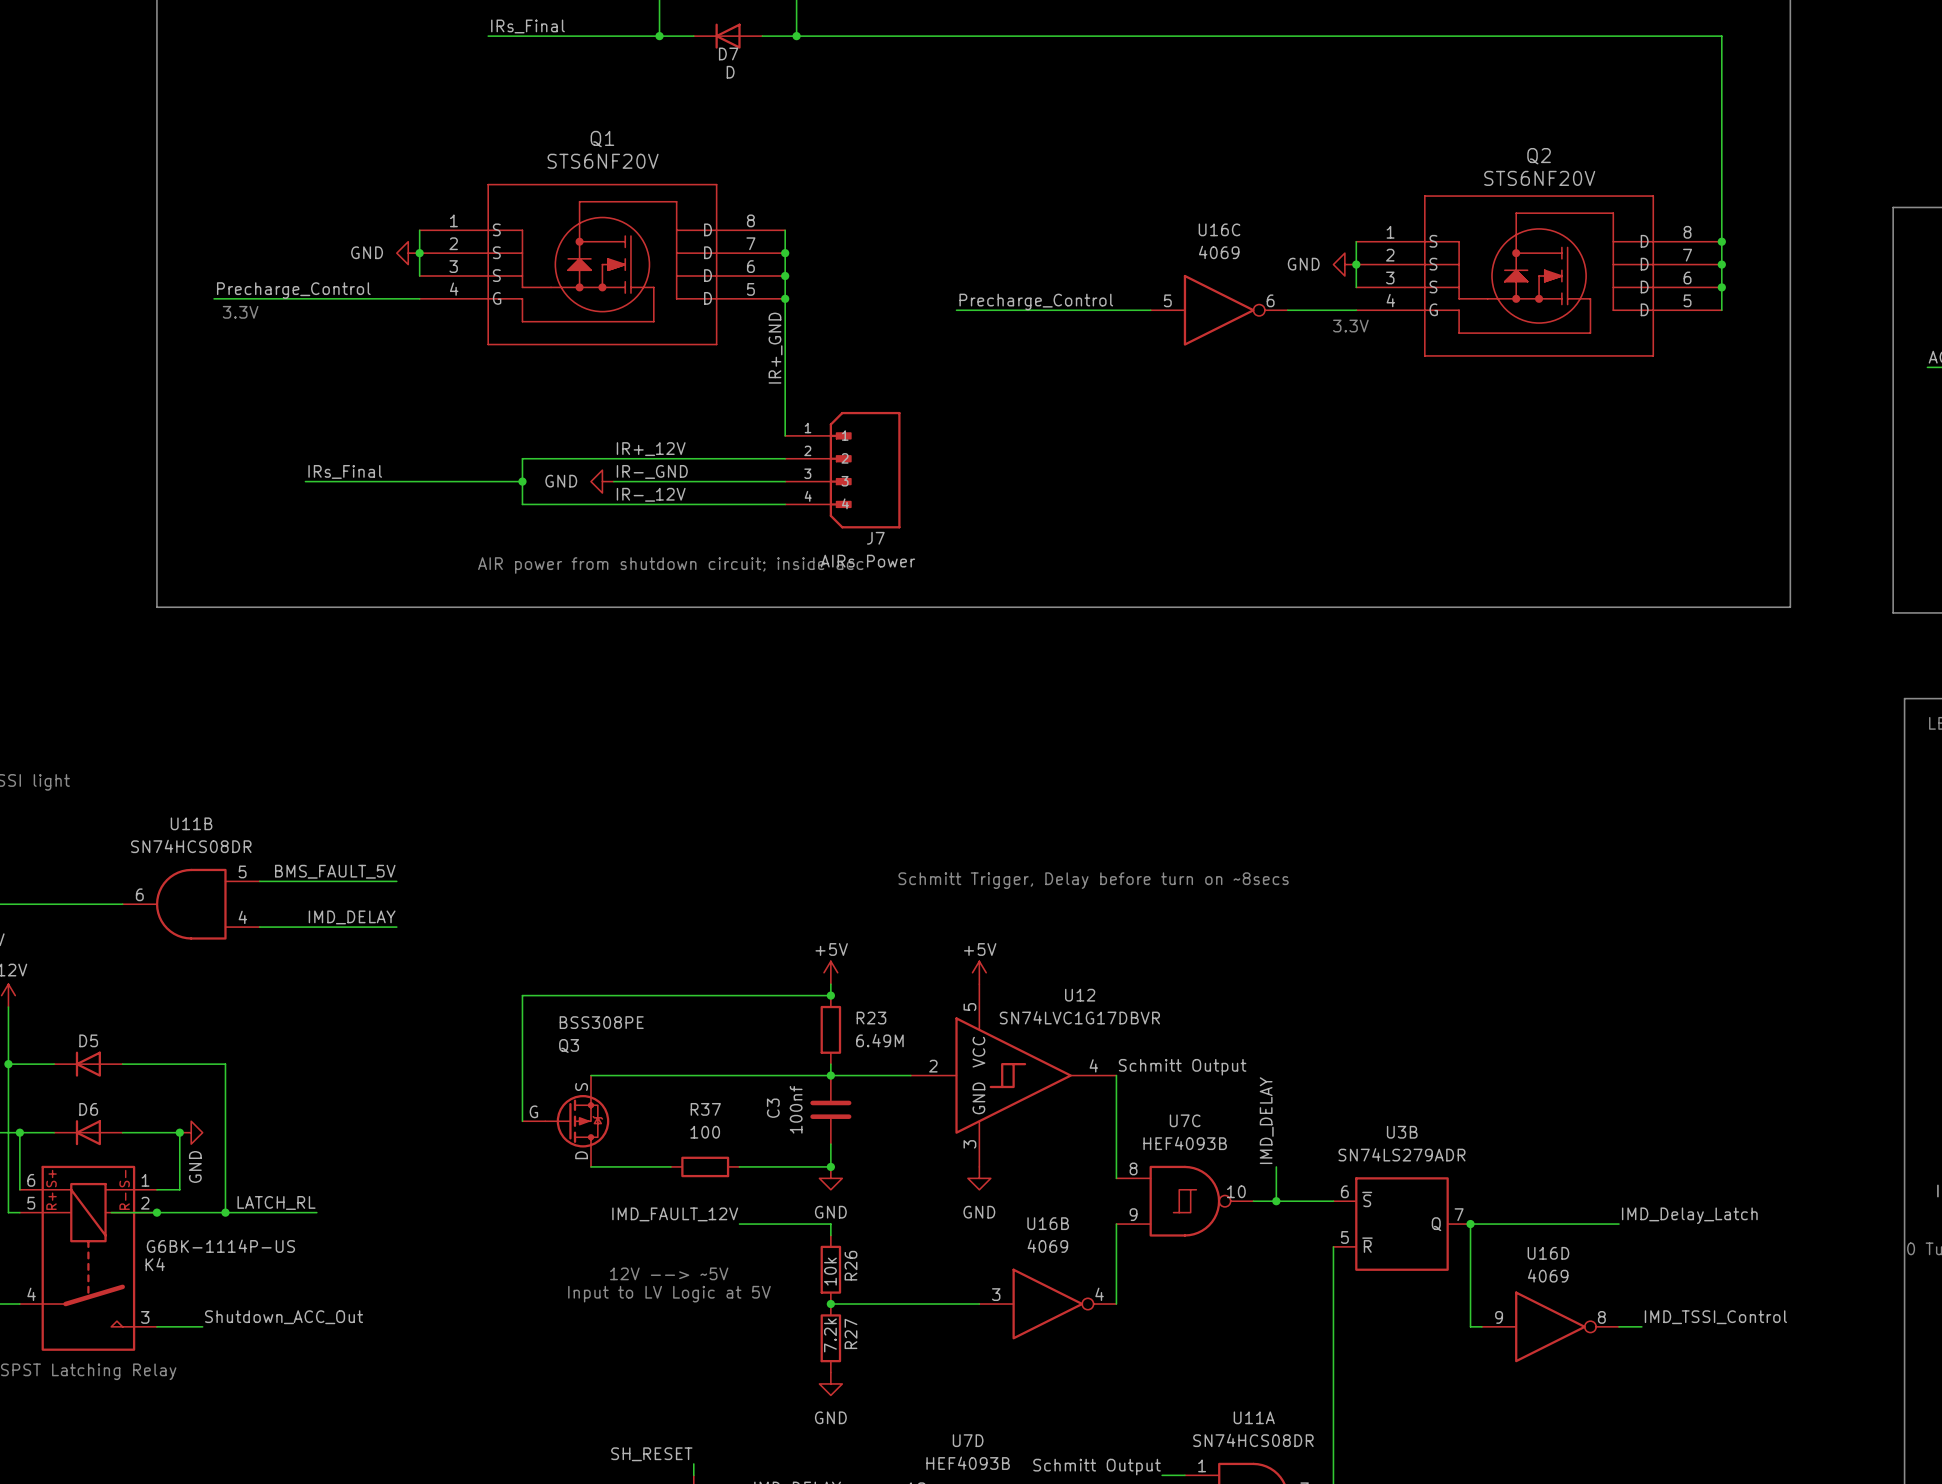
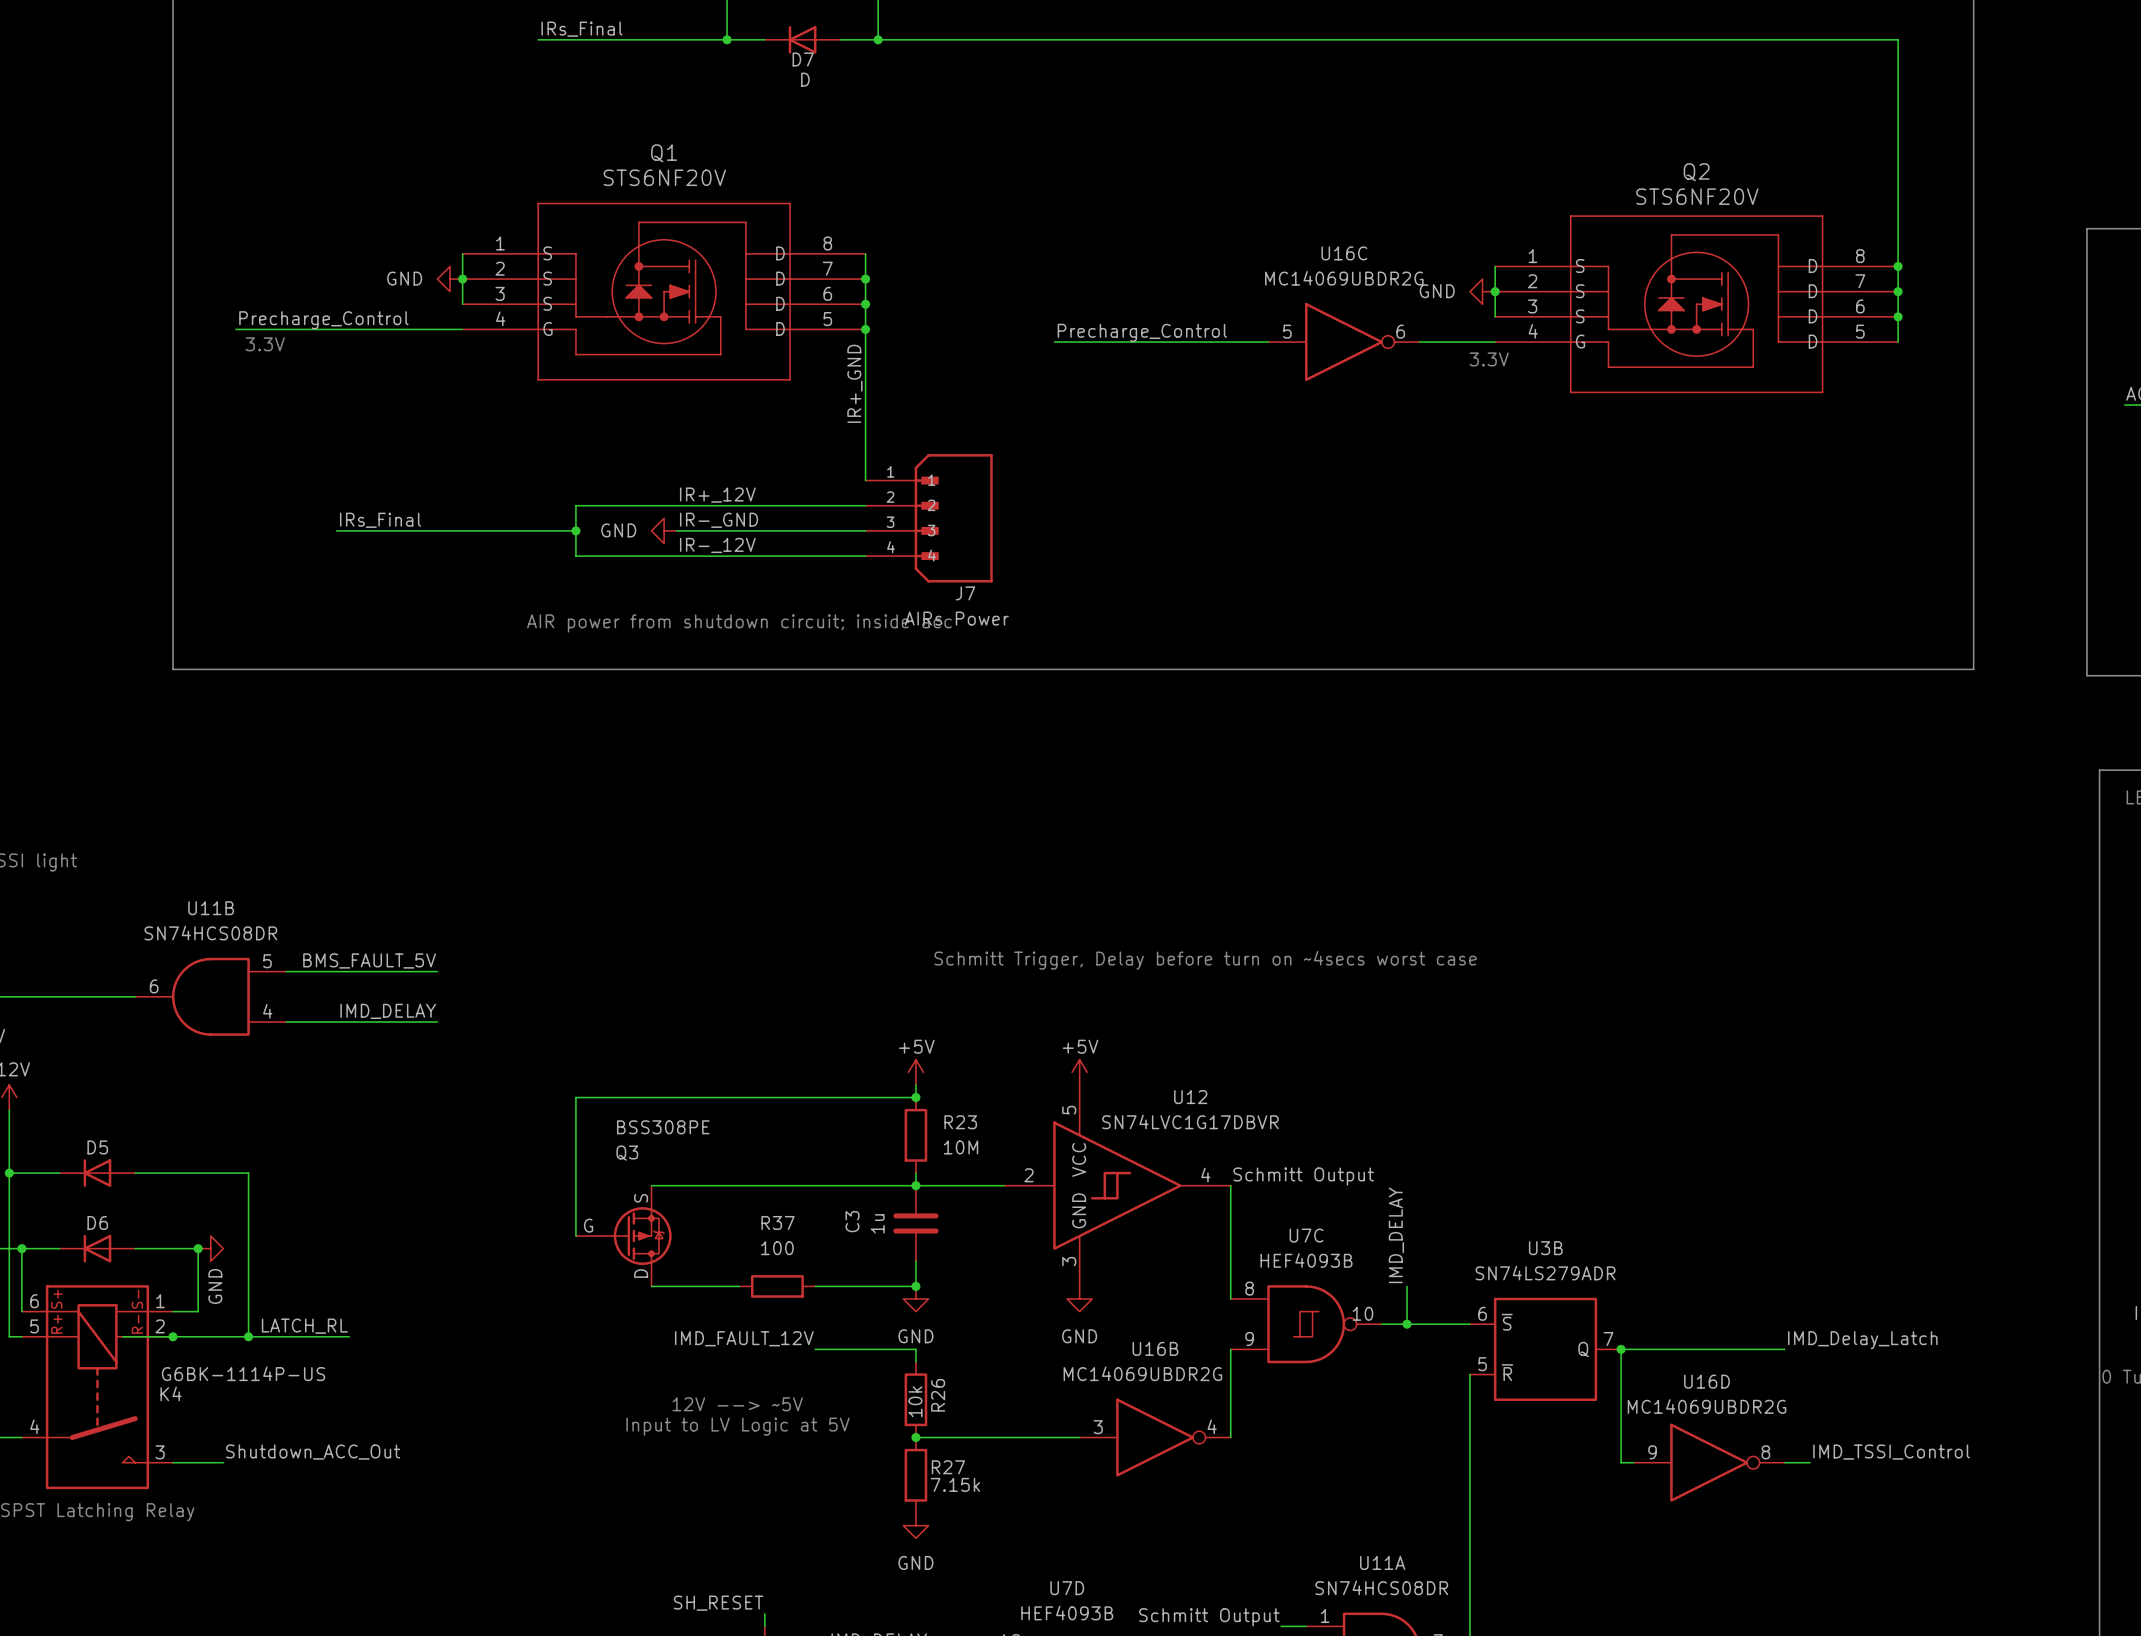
U16C value: 4069 (1219, 252) -> MC14069UBDR2G (1344, 278)
text: Schmitt Trigger, Delay before turn on ~8secs (1093, 880) -> Schmitt Trigger, Delay before turn on ~4secs worst case (1205, 960)
R23 value: 6.49M (879, 1040) -> 10M (961, 1147)
C3 value: 100nf (796, 1109) -> 1u (877, 1223)
U16B value: 4069 (1047, 1246) -> MC14069UBDR2G (1142, 1373)
U16D value: 4069 (1548, 1275) -> MC14069UBDR2G (1707, 1406)
R27 name rotation: 0° (851, 1333) -> 90° clockwise (948, 1467)
R27 value: 7.2k (830, 1335) -> 7.15k (955, 1484)

